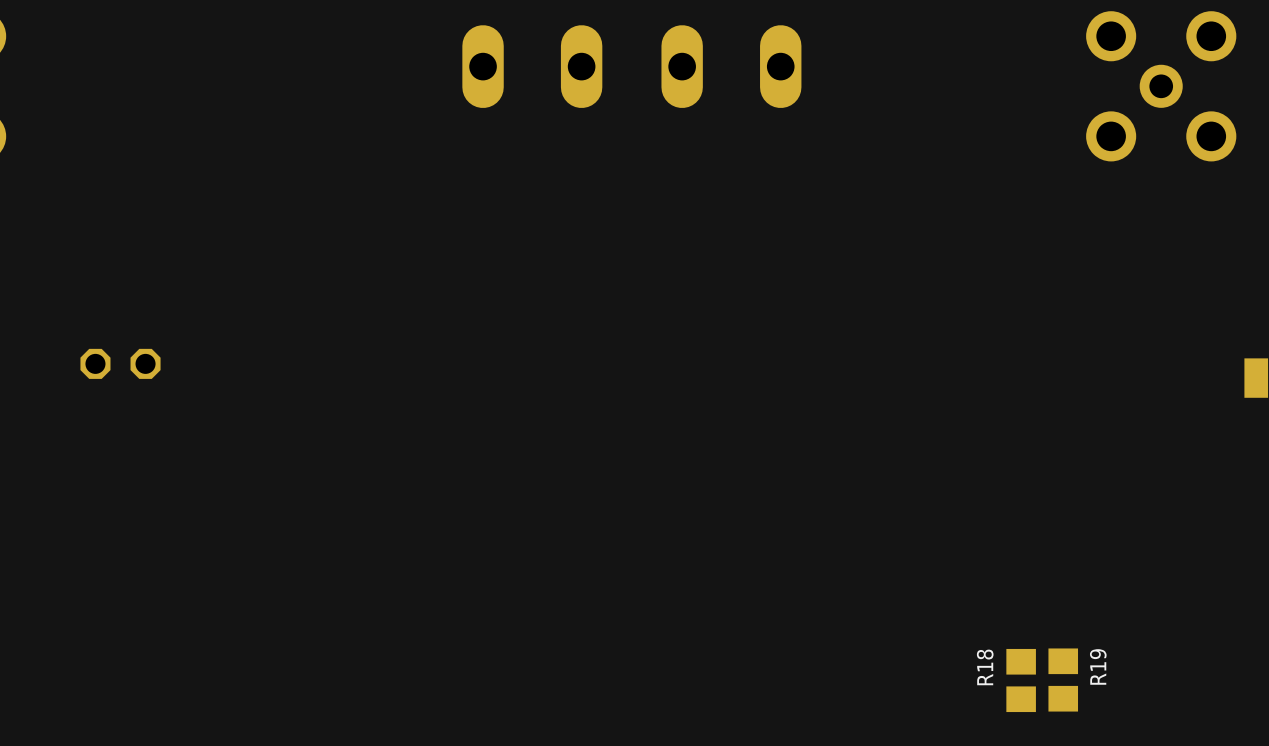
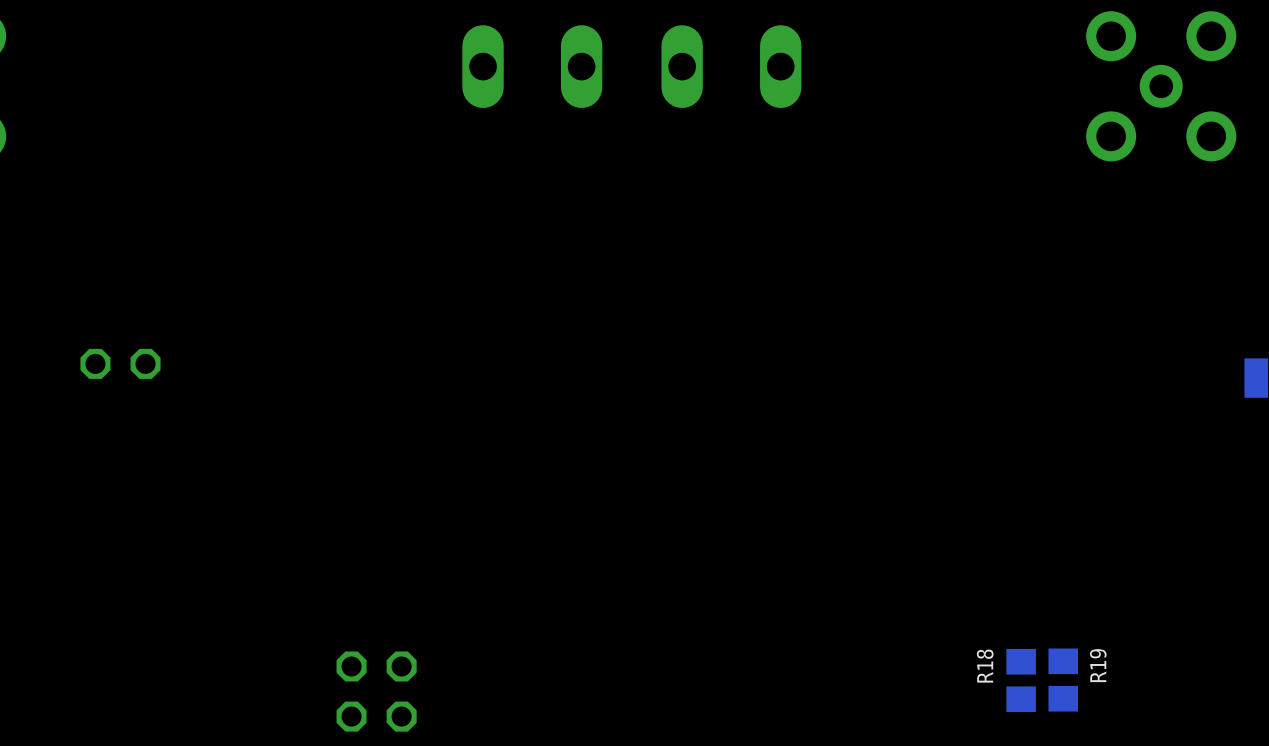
part: none -> (376, 691)

